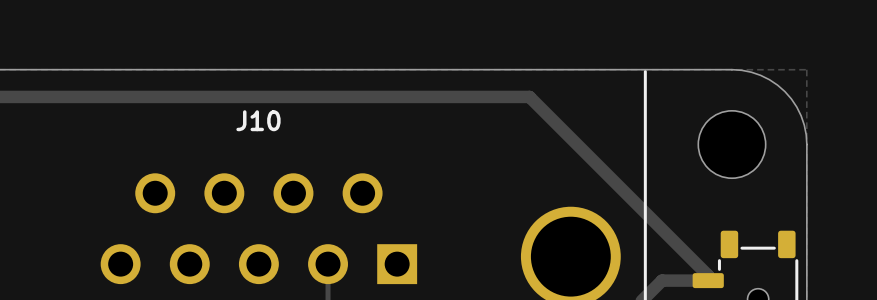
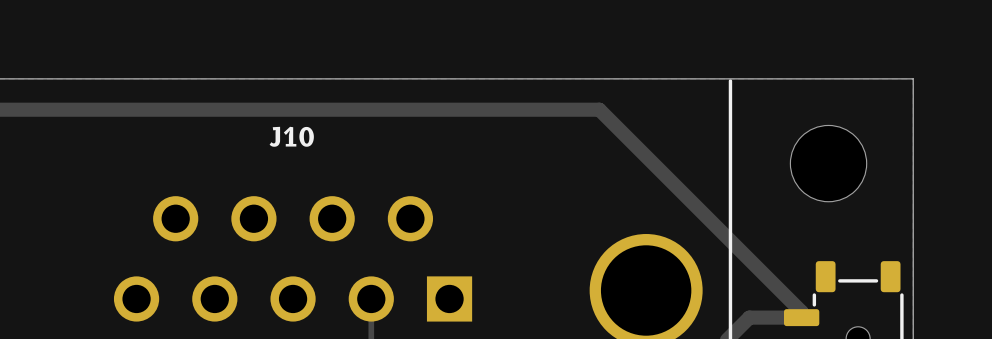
board edge: (731, 69) (760, 75) (784, 91) (801, 115) (806, 144) -> (828, 78) (913, 78) (913, 163)

